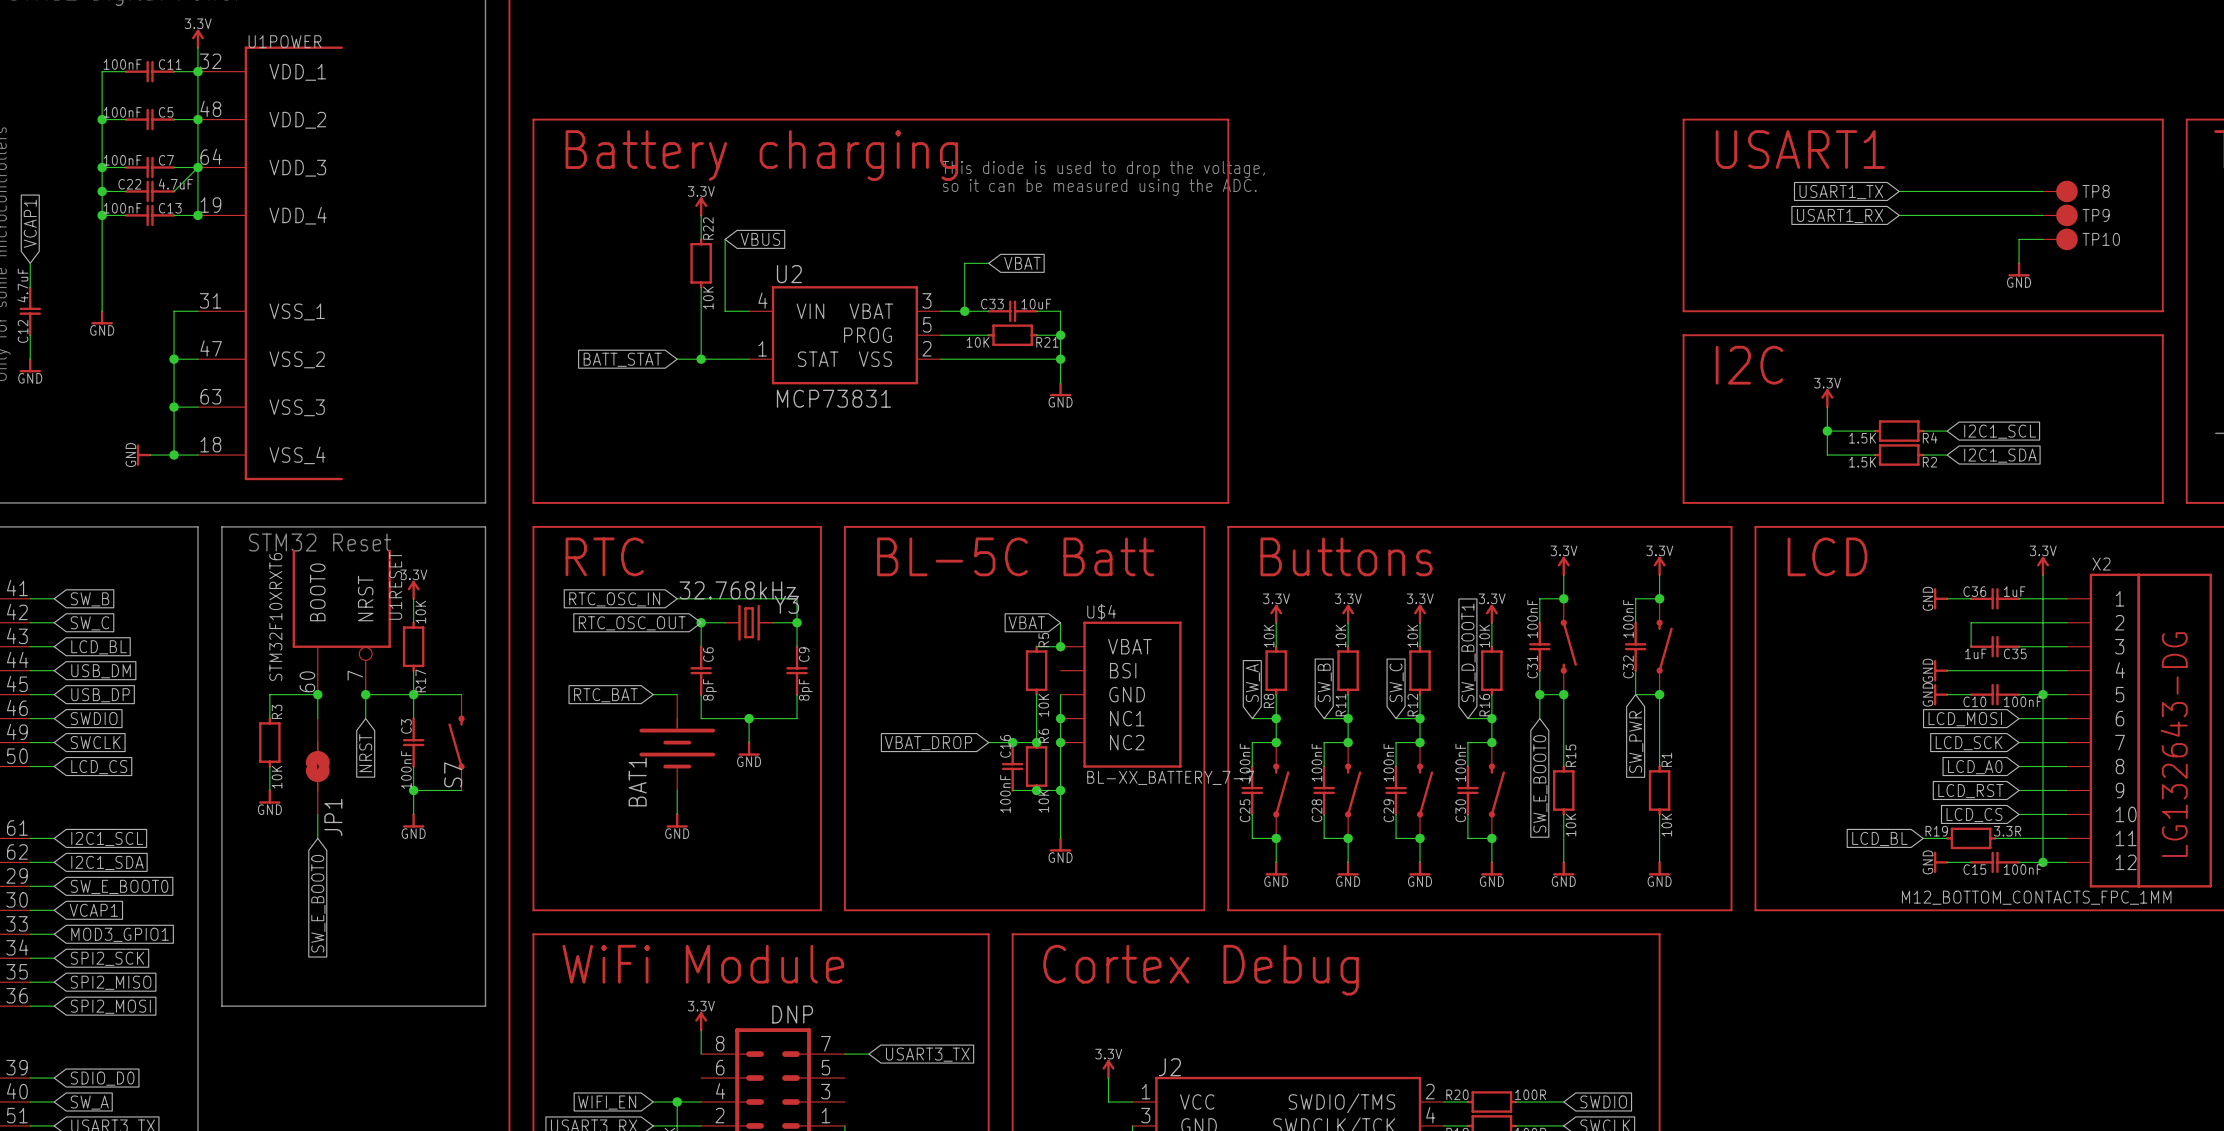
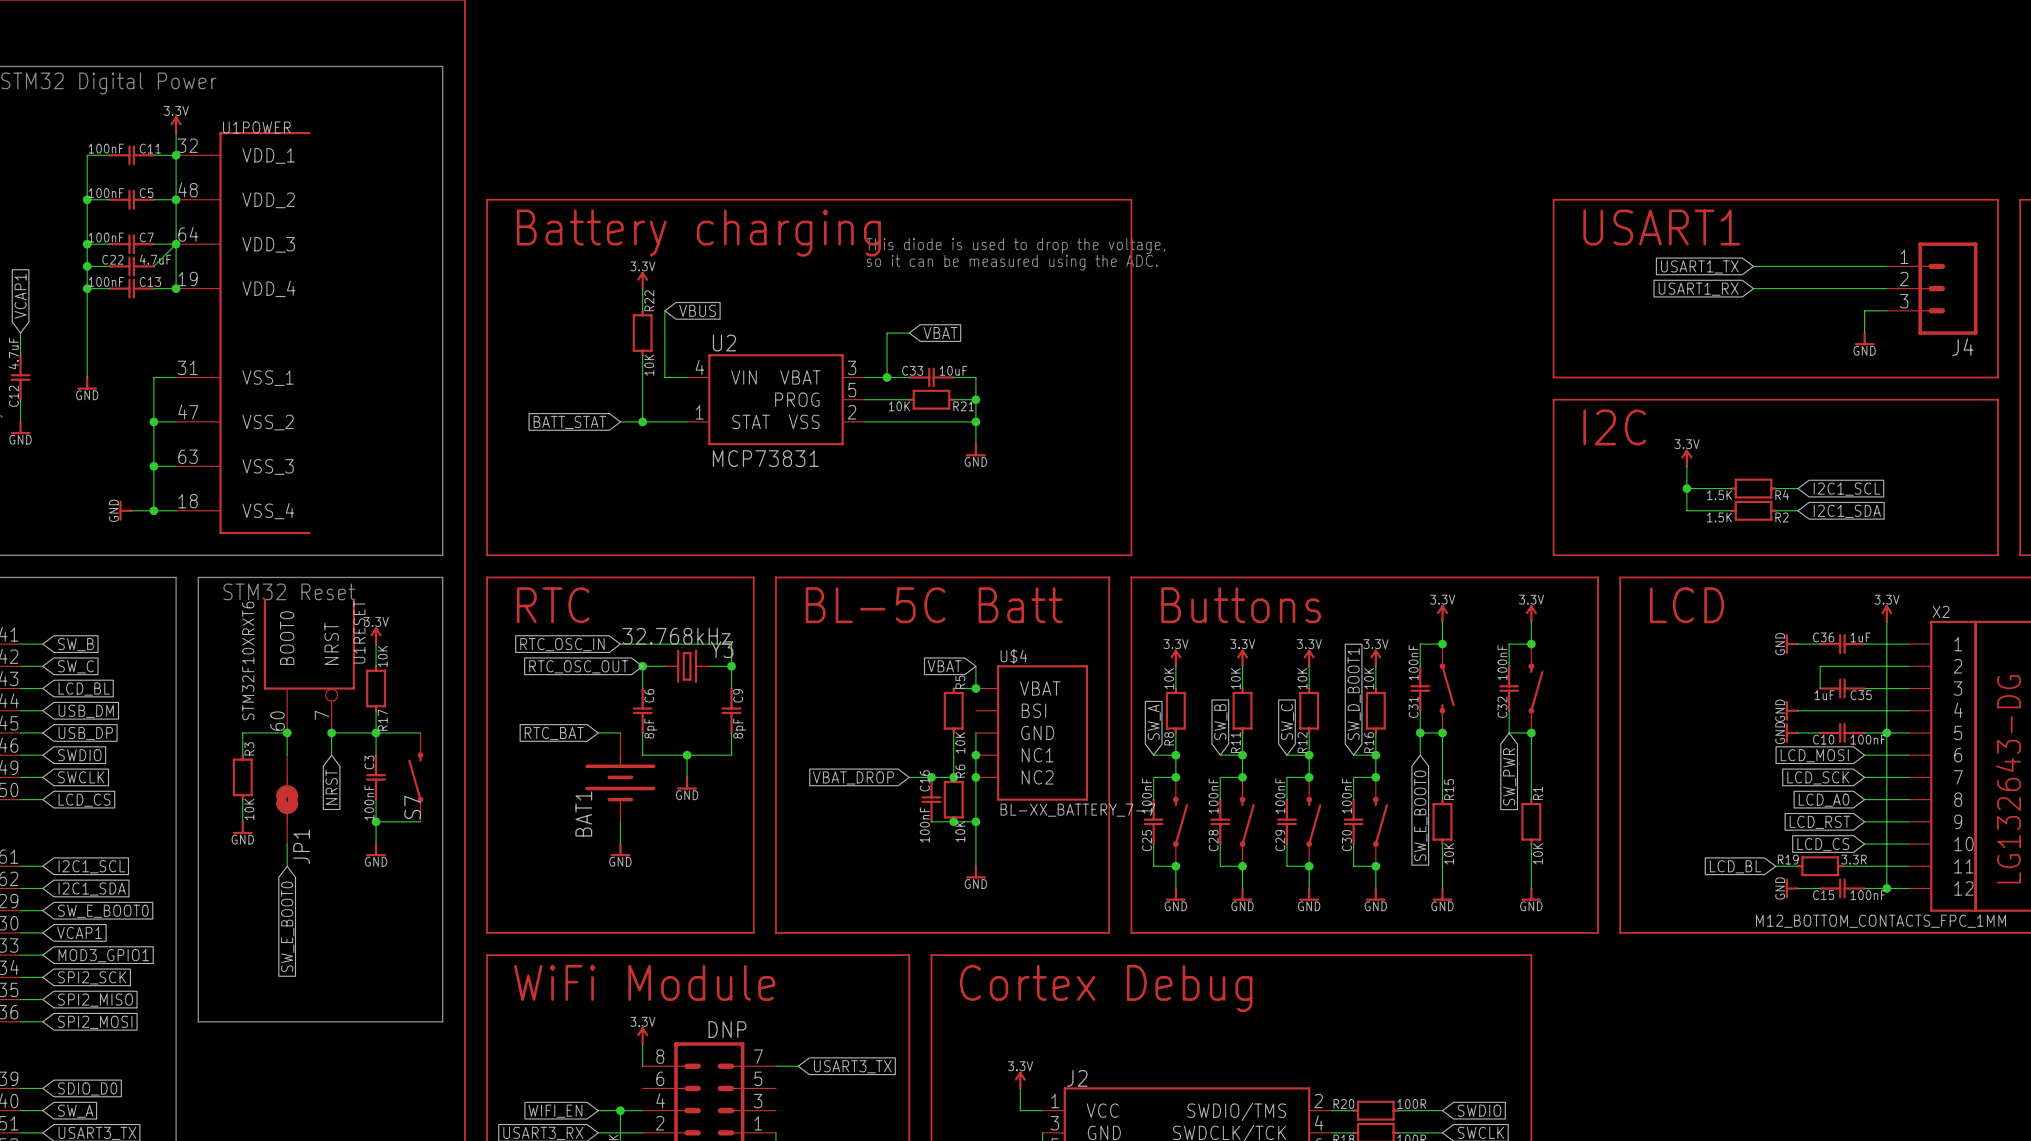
TP8: (2060, 191) -> none
TP9: (2060, 215) -> none
J4: none -> (1932, 288)
TP10: (2060, 239) -> none

